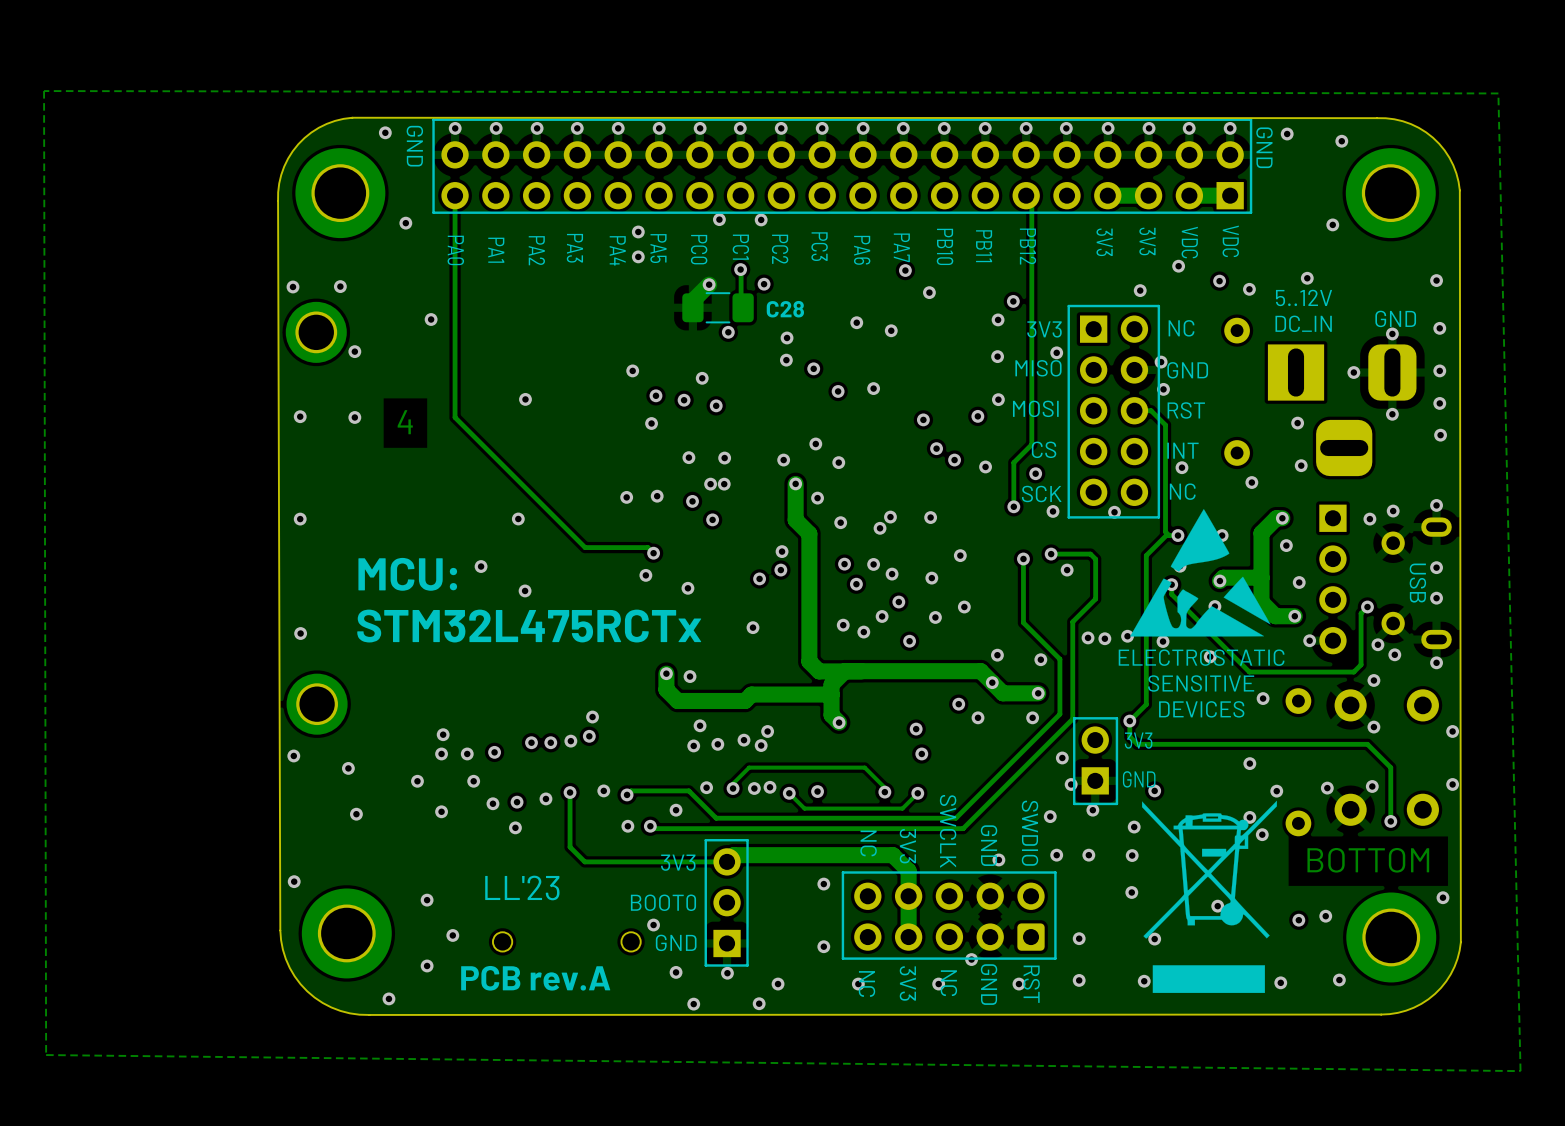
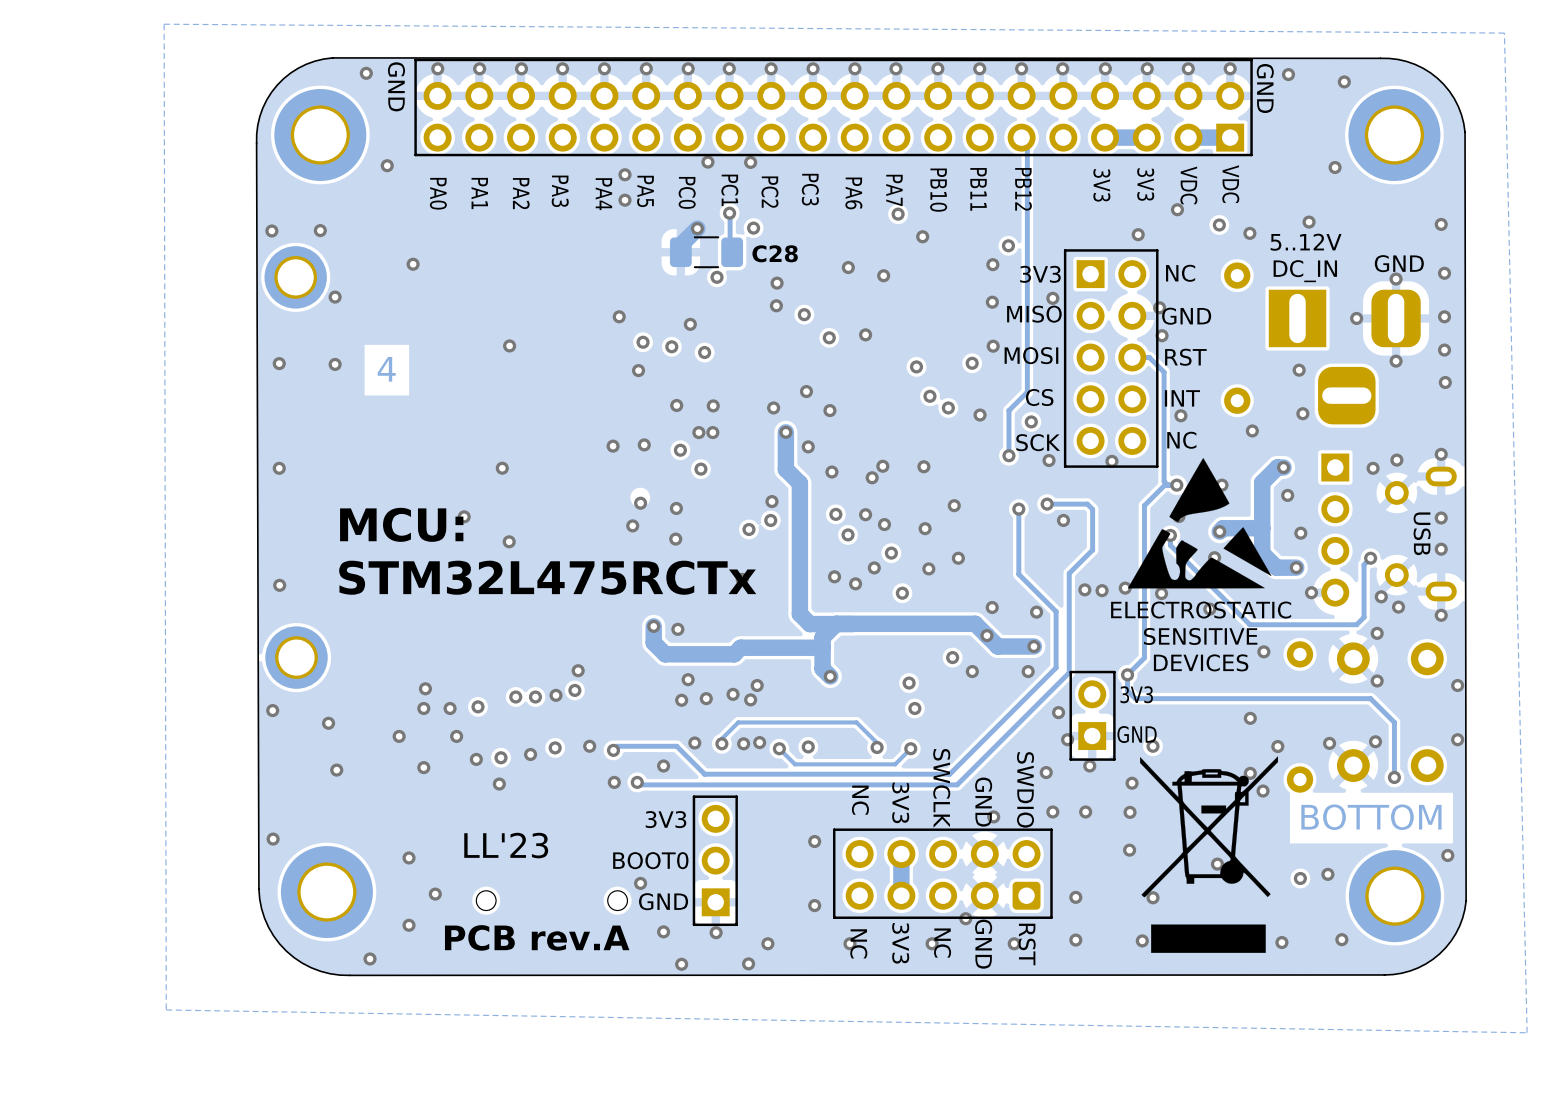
zone outline: (1498, 93) (44, 91) (46, 1055) (1520, 1071) -> (1504, 33) (164, 24) (166, 1009) (1527, 1032)
track: (455, 195) (455, 417) (585, 547) (647, 547) (653, 553) -> none
via: none -> (676, 508)
track: (570, 792) (570, 847) (584, 861) (727, 861) (733, 855) (892, 855) (908, 870) (908, 896) -> none

